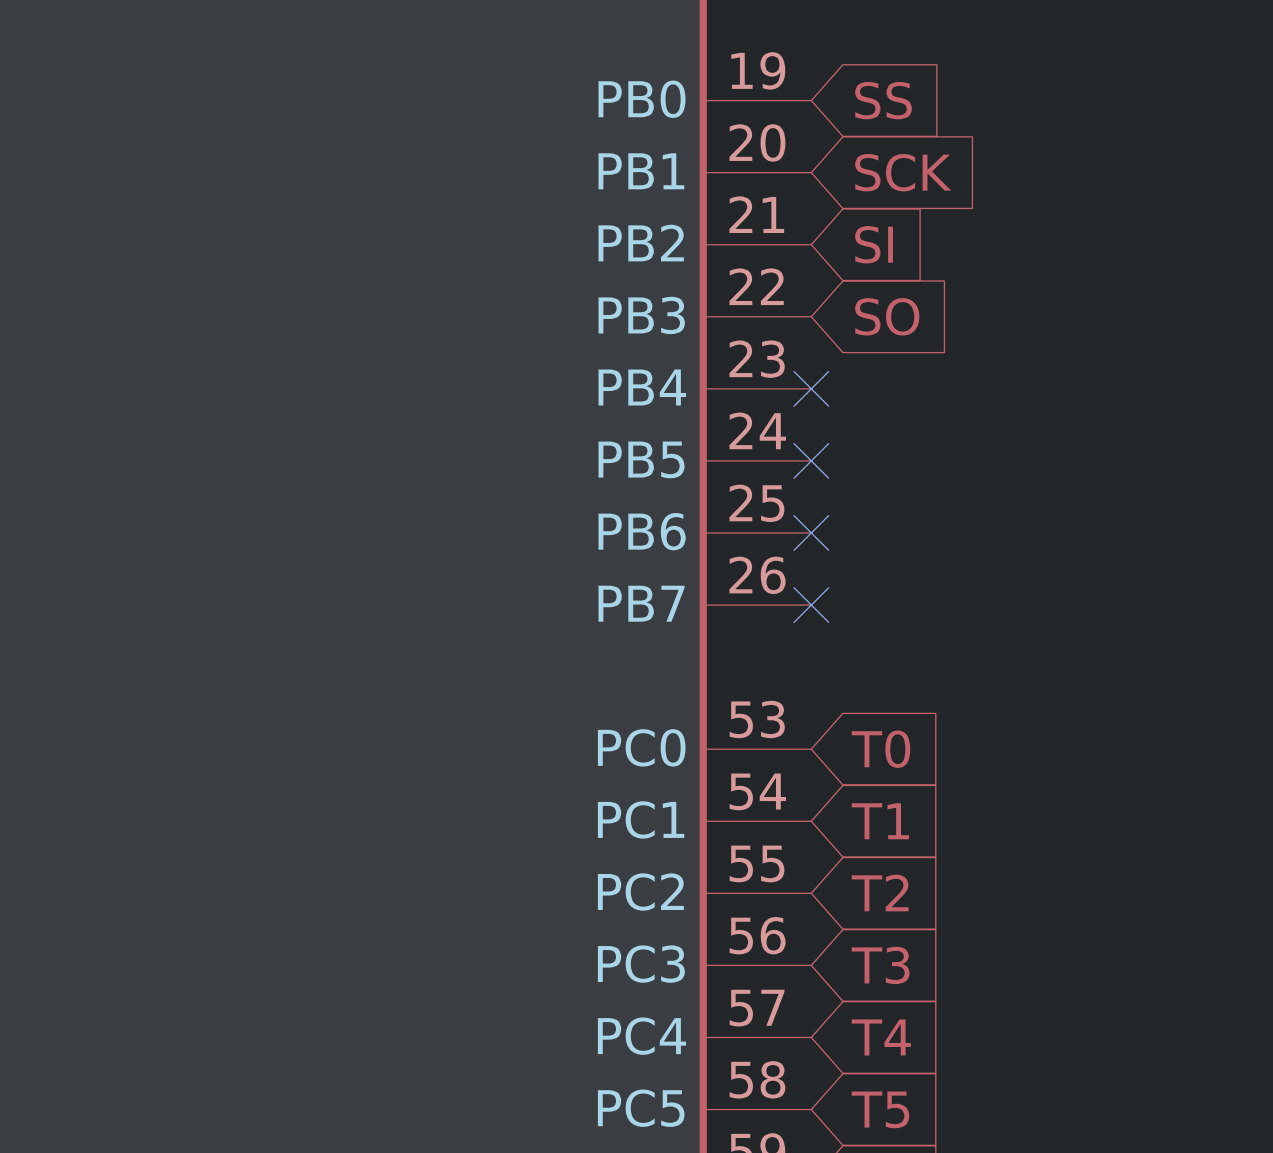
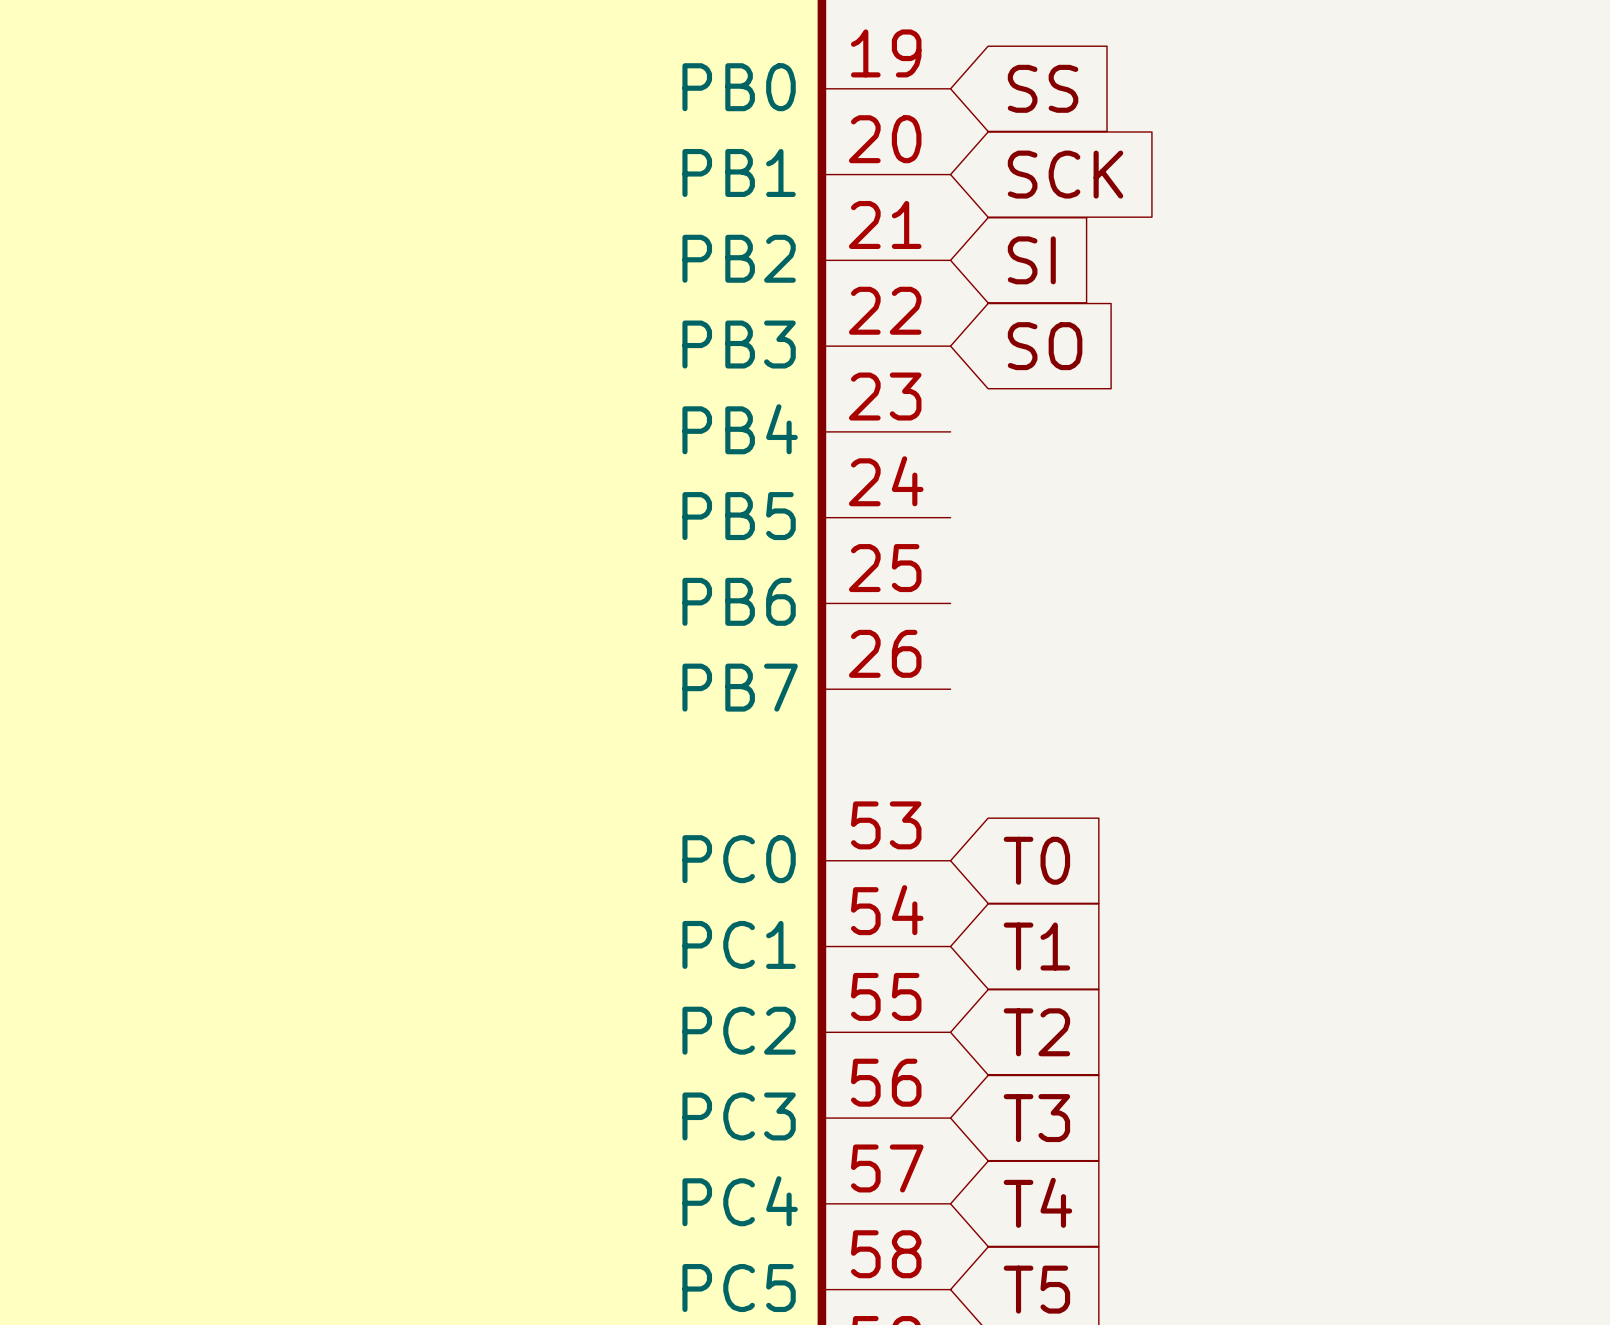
no-connect mark: (811, 388) -> none
no-connect mark: (811, 460) -> none
no-connect mark: (811, 532) -> none
no-connect mark: (811, 605) -> none

